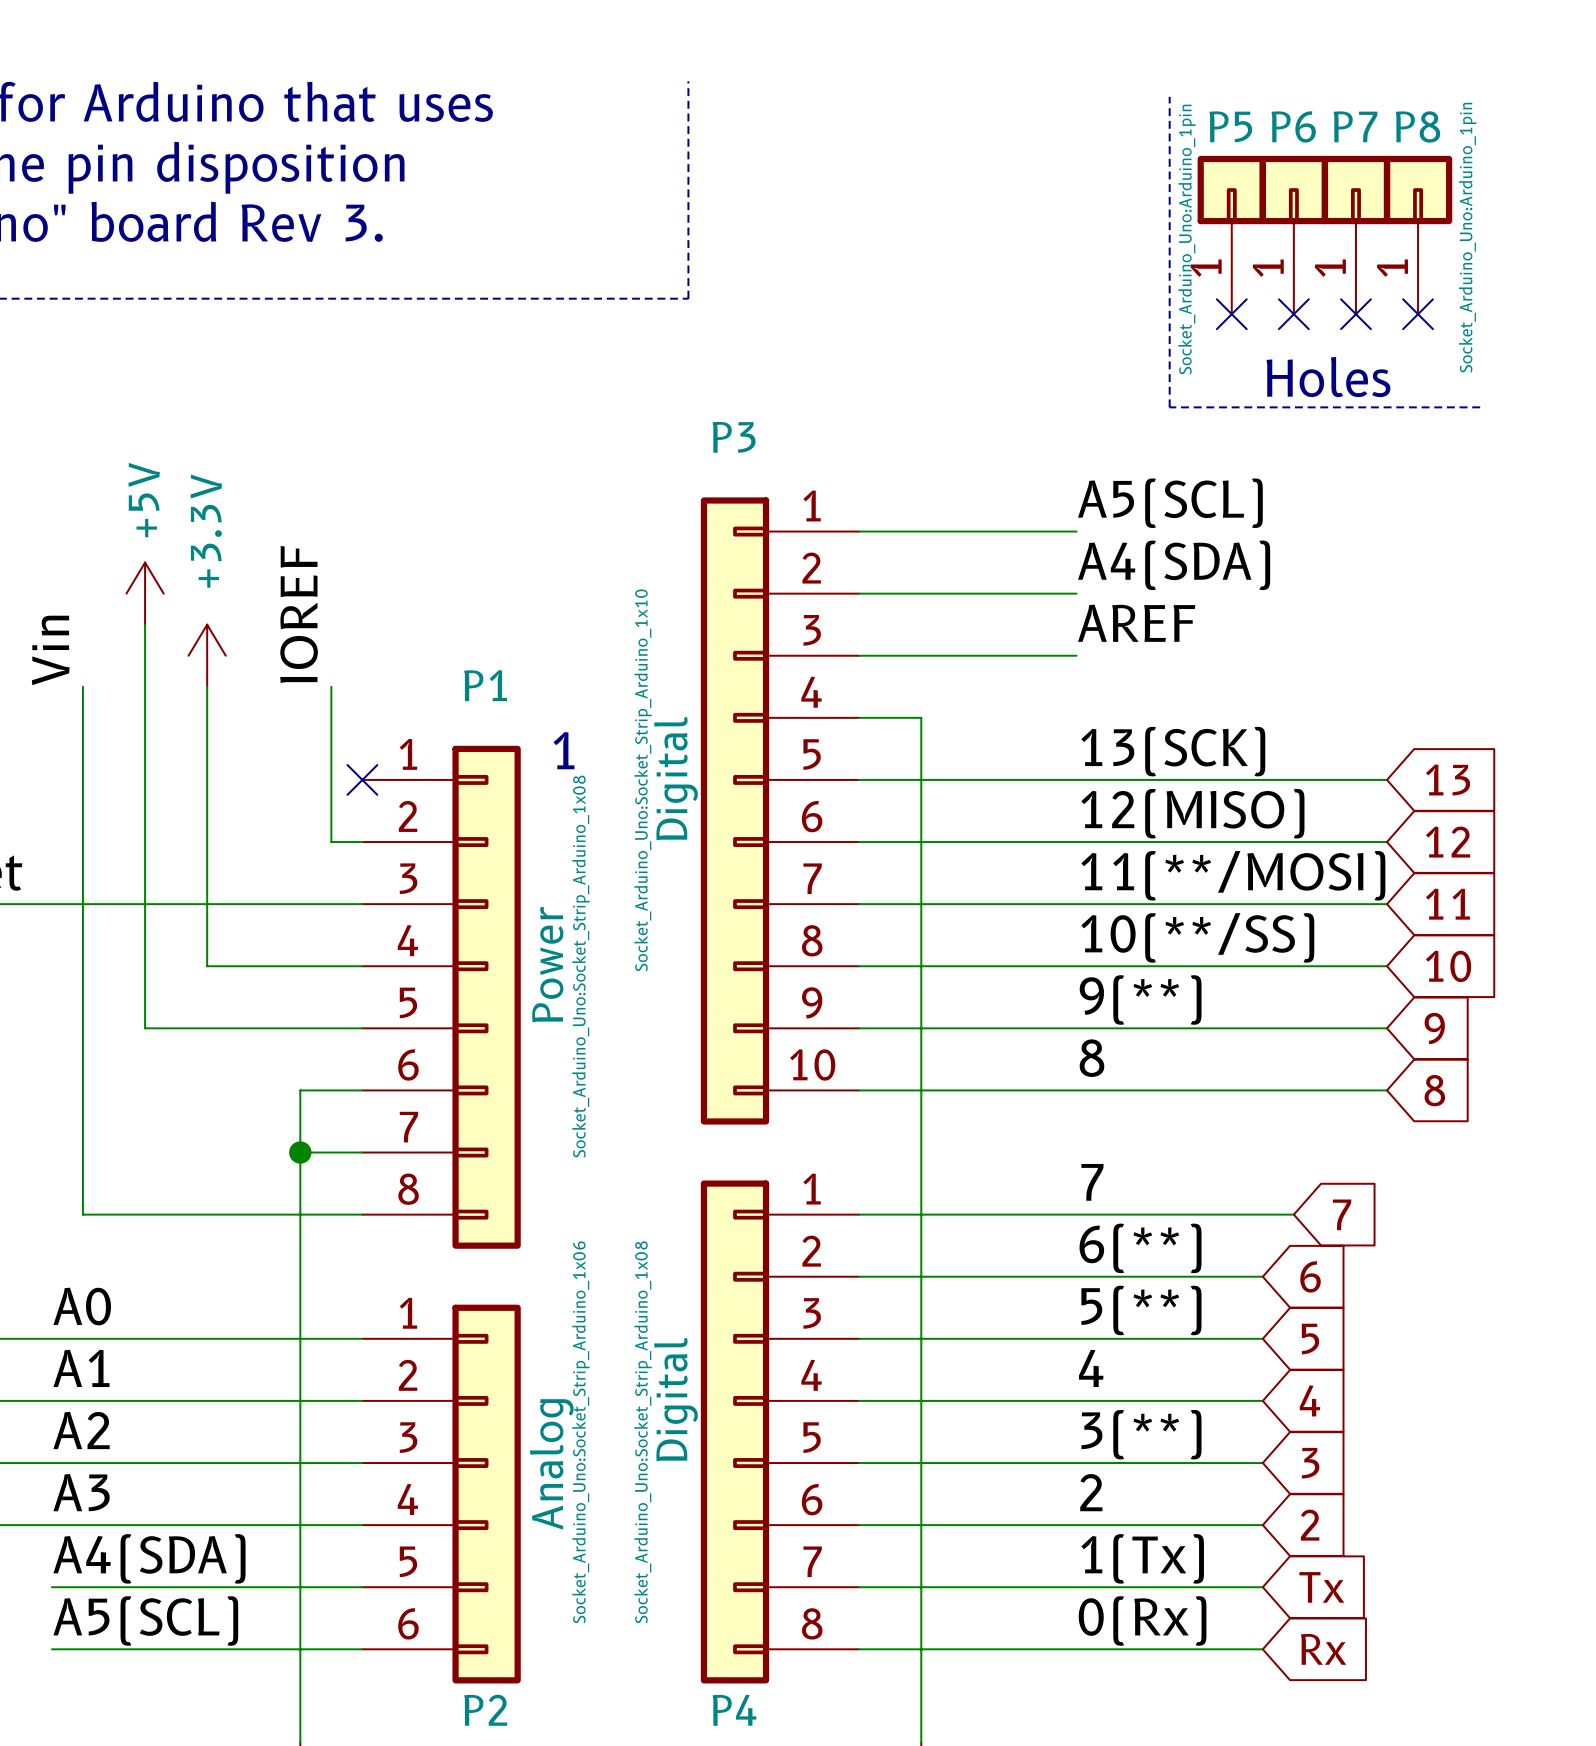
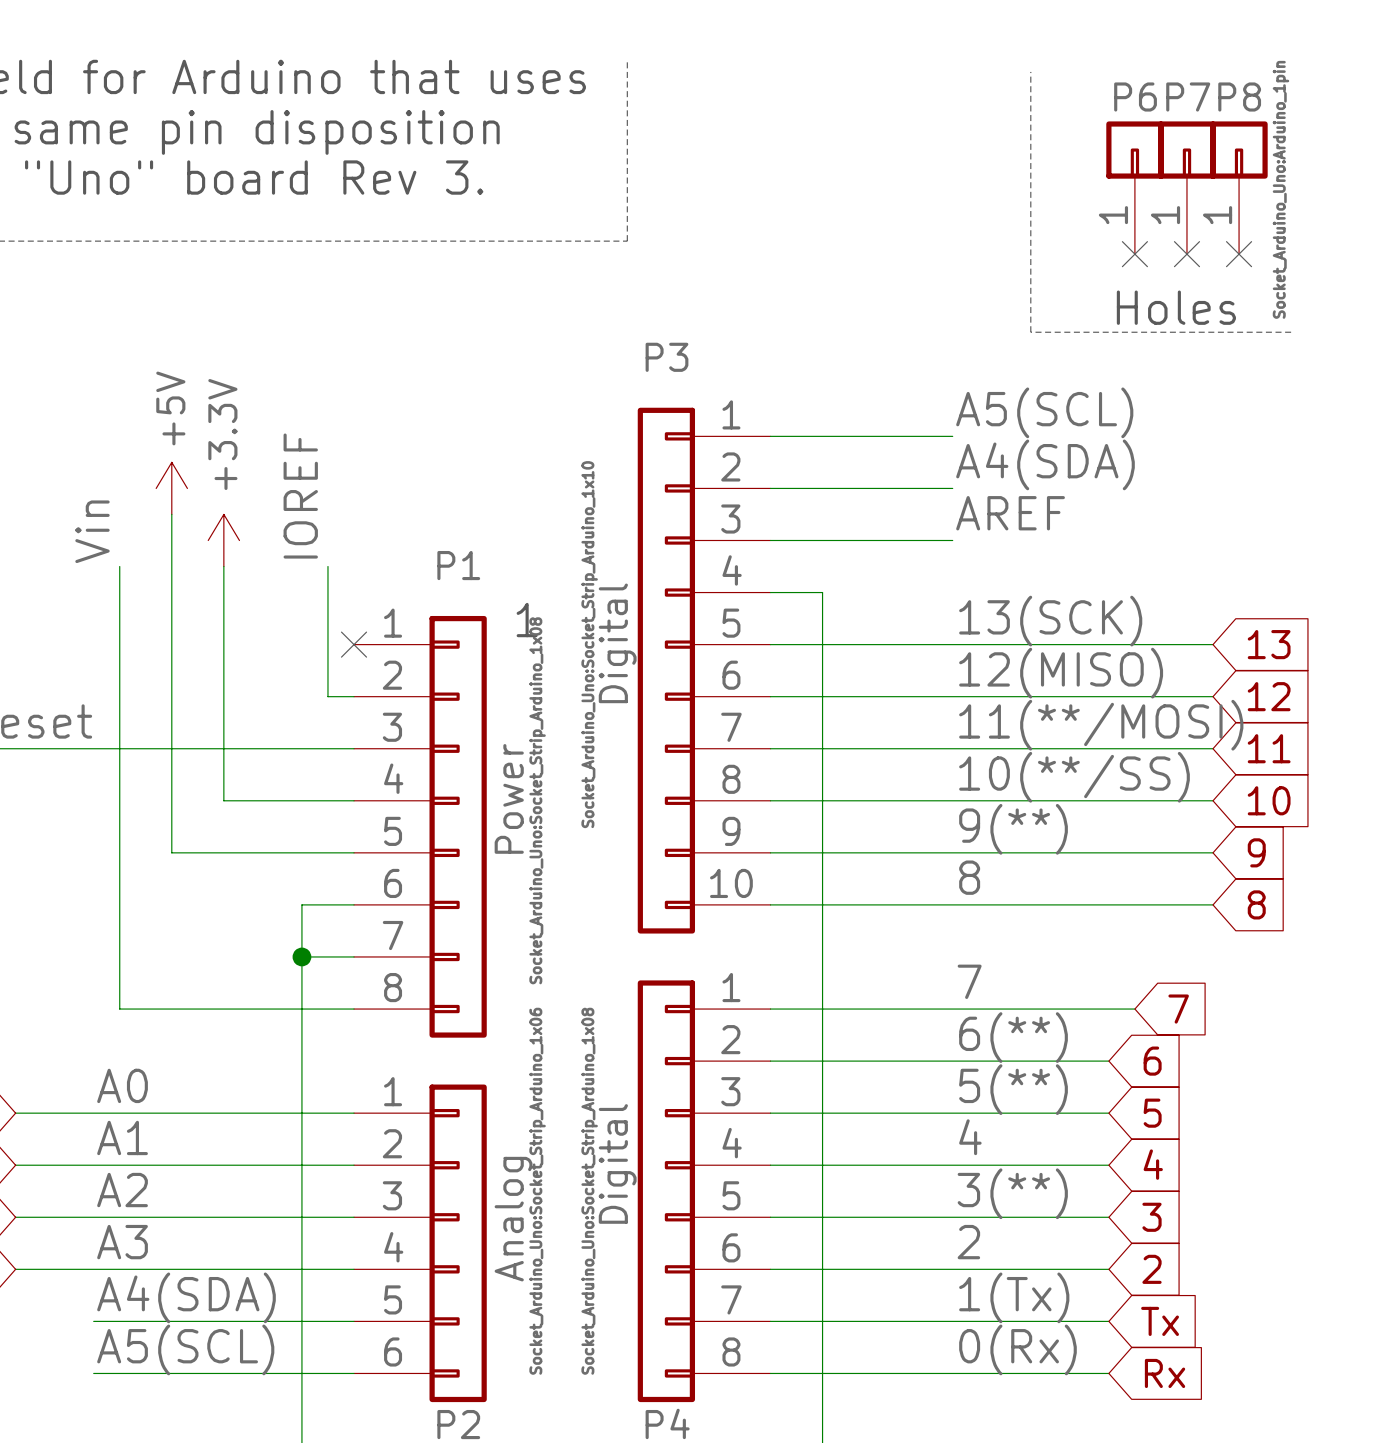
P5: (1231, 235) -> none
no-connect mark: (1231, 314) -> none

